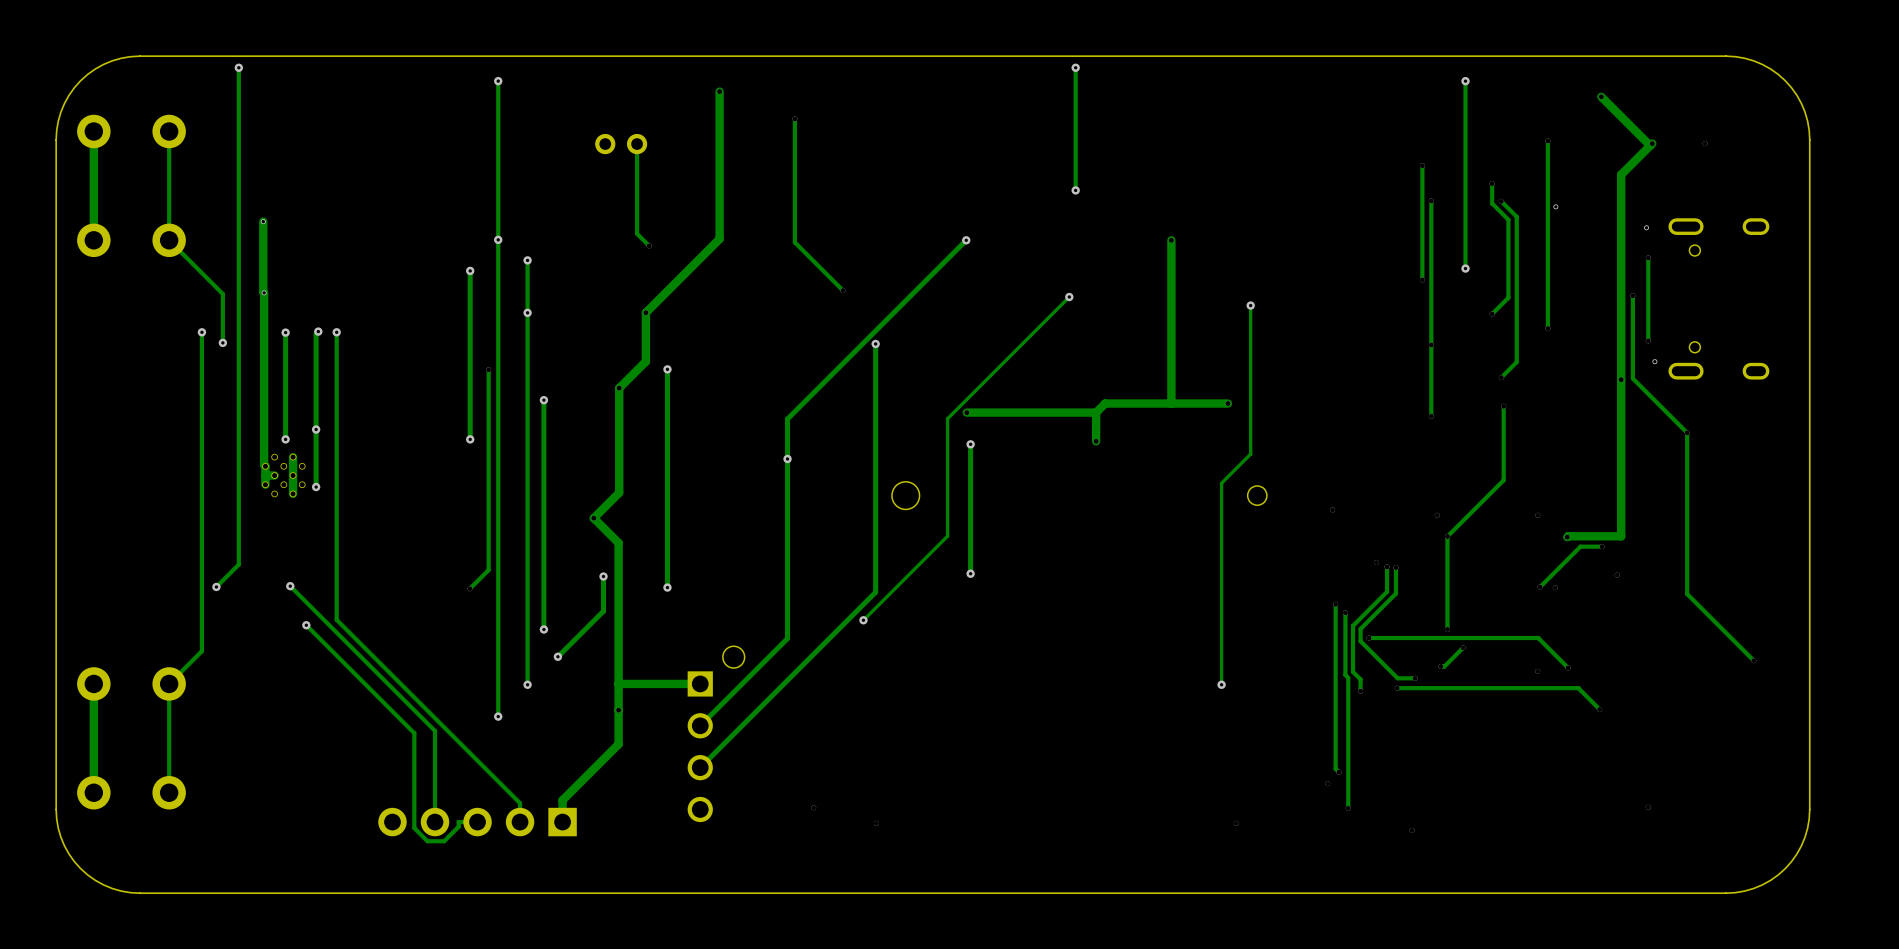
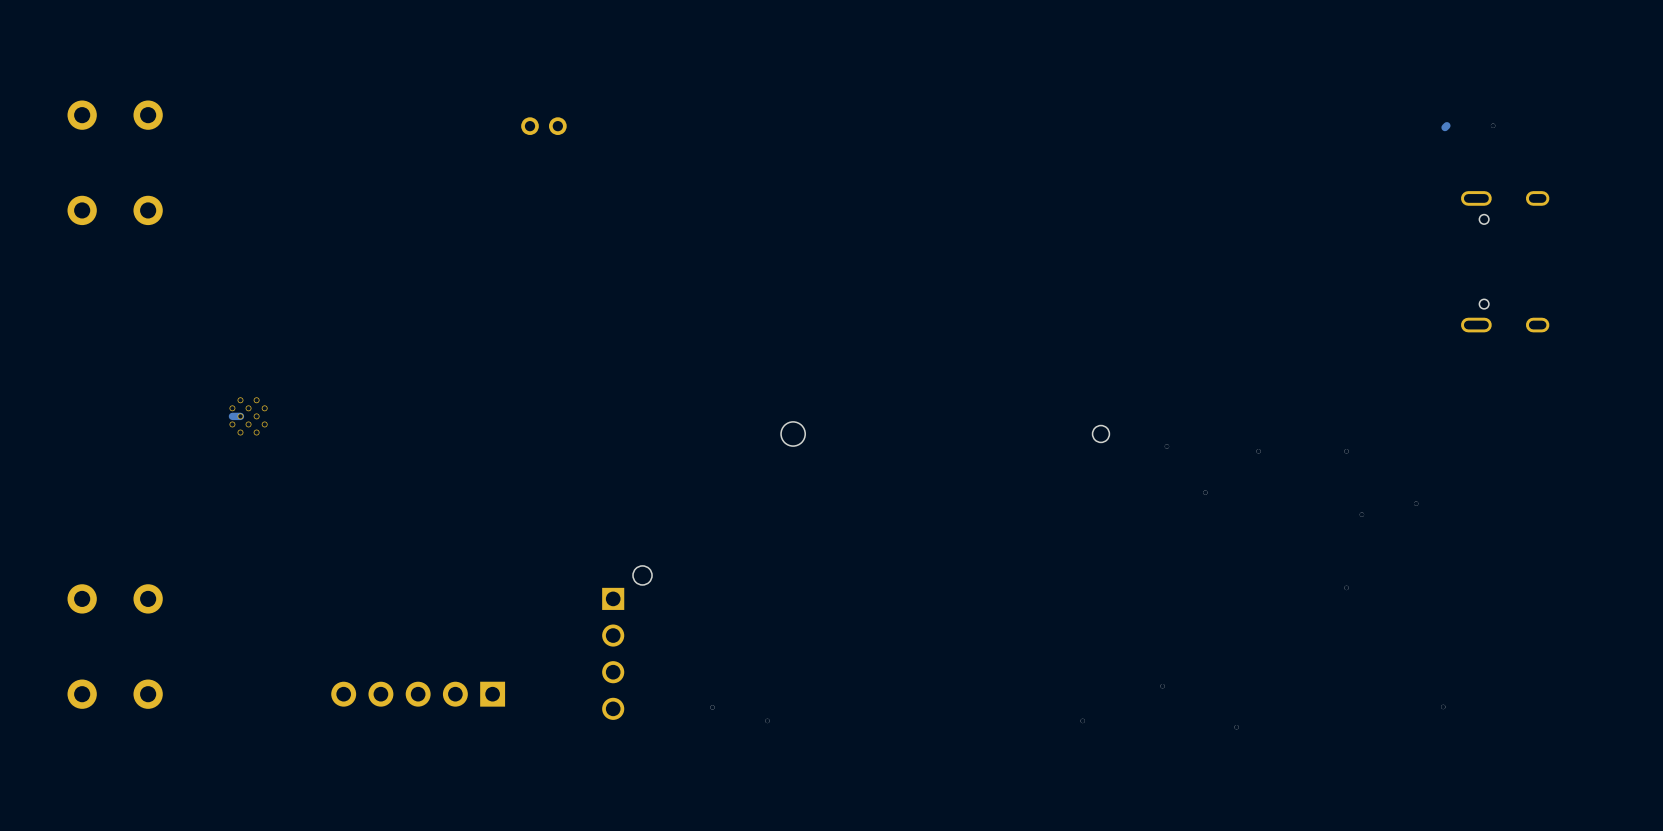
board edge: (1726, 56) (139, 56) (121, 58) (103, 64) (87, 74) (68, 95) (58, 121) (56, 139) (56, 809) (58, 828) (64, 845) (80, 868) (95, 880) (121, 891) (139, 893) (1726, 893) (1744, 891) (1762, 884) (1785, 868) (1796, 854) (1805, 837) (1809, 818) (1809, 139) (1805, 112) (1796, 95) (1785, 80) (1770, 68) (1753, 60) (1726, 56) -> none
track: (238, 67) (238, 564) (216, 586) -> none
via: (238, 67) -> none
track: (1075, 67) (1075, 190) -> none
via: (1075, 67) -> none
track: (498, 81) (498, 716) -> none
via: (498, 81) -> none
track: (1465, 81) (1465, 268) -> none
via: (1465, 81) -> none
track: (719, 91) (719, 239) (645, 312) (645, 361) (619, 388) (619, 492) (593, 518) (618, 542) (618, 744) (562, 800) (562, 822) -> none
via: (719, 91) -> none
track: (1601, 96) (1650, 145) (1621, 174) (1621, 536) (1567, 537) -> none
via: (1601, 96) -> none
track: (794, 118) (794, 242) (842, 290) -> none
via: (794, 118) -> none
track: (93, 131) (93, 240) -> none
track: (169, 131) (169, 240) (222, 294) (222, 342) -> none
track: (1547, 140) (1547, 328) -> none
via: (1547, 140) -> none
via: (1652, 143) -> none
track: (637, 144) (637, 233) (649, 245) -> none
track: (1422, 165) (1422, 279) -> none
via: (1422, 165) -> none
track: (1492, 183) (1492, 203) (1508, 219) (1508, 297) (1492, 314) -> none
via: (1492, 183) -> none
via: (1075, 190) -> none
track: (1431, 200) (1431, 416) -> none
via: (1431, 200) -> none
track: (1501, 201) (1516, 216) (1516, 362) (1501, 377) -> none
via: (1501, 201) -> none
via: (1555, 206) -> none
track: (263, 221) (265, 484) -> none
via: (263, 221) -> none
via: (1646, 227) -> none
via: (498, 239) -> none
track: (966, 240) (787, 419) (787, 638) (700, 725) -> none
via: (966, 240) -> none
track: (1171, 240) (1171, 403) -> none
via: (1171, 240) -> none
via: (649, 245) -> none
track: (1648, 257) (1648, 340) -> none
via: (1648, 257) -> none
track: (527, 260) (527, 684) -> none
via: (527, 260) -> none
via: (1465, 268) -> none
track: (470, 270) (470, 439) -> none
via: (470, 270) -> none
via: (1422, 279) -> none
via: (842, 290) -> none
via: (264, 292) -> none
track: (1632, 295) (1632, 378) (1687, 432) (1687, 594) (1753, 660) -> none
via: (1632, 295) -> none
track: (1069, 297) (947, 418) (947, 536) (863, 620) -> none
via: (1069, 297) -> none
track: (1250, 305) (1250, 454) (1221, 483) (1221, 684) -> none
via: (1250, 305) -> none
via: (527, 312) -> none
via: (645, 312) -> none
via: (1492, 314) -> none
via: (1547, 328) -> none
track: (318, 331) (316, 333) (316, 487) -> none
via: (318, 331) -> none
track: (201, 332) (201, 651) (169, 683) (169, 792) -> none
via: (201, 332) -> none
track: (285, 332) (285, 439) -> none
via: (285, 332) -> none
track: (336, 332) (336, 619) (520, 803) (520, 822) -> none
via: (336, 332) -> none
via: (1648, 340) -> none
via: (222, 342) -> none
track: (875, 343) (875, 592) (700, 767) -> none
via: (875, 343) -> none
via: (1431, 344) -> none
via: (1654, 361) -> none
track: (488, 369) (488, 570) (469, 588) -> none
via: (488, 369) -> none
track: (667, 369) (667, 587) -> none
via: (667, 369) -> none
via: (1501, 377) -> none
via: (1621, 379) -> none
via: (619, 388) -> none
track: (543, 400) (543, 629) -> none
via: (543, 400) -> none
track: (1228, 403) (1105, 403) (1096, 412) -> none
via: (1228, 403) -> none
track: (1503, 406) (1503, 480) (1447, 536) (1447, 629) -> none
via: (1503, 406) -> none
via: (966, 412) -> none
track: (1096, 412) (966, 412) -> none
track: (1096, 412) (1096, 441) -> none
via: (1431, 416) -> none
via: (316, 429) -> none
via: (1687, 432) -> none
via: (285, 439) -> none
via: (470, 439) -> none
via: (1096, 441) -> none
track: (970, 444) (970, 573) -> none
via: (970, 444) -> none
track: (293, 457) (293, 493) -> none
via: (787, 458) -> none
via: (316, 487) -> none
via: (593, 518) -> none
via: (1447, 536) -> none
via: (1567, 537) -> none
track: (1602, 546) (1580, 546) (1540, 587) -> none
via: (1602, 546) -> none
track: (1387, 566) (1387, 591) (1353, 625) (1353, 671) (1360, 679) (1360, 691) -> none
via: (1387, 566) -> none
track: (1395, 567) (1395, 593) (1360, 628) (1360, 641) (1397, 678) (1415, 678) -> none
via: (1395, 567) -> none
via: (970, 573) -> none
track: (603, 576) (603, 611) (557, 656) -> none
via: (603, 576) -> none
via: (216, 586) -> none
track: (290, 586) (435, 730) (435, 822) -> none
via: (290, 586) -> none
via: (667, 587) -> none
via: (1540, 587) -> none
via: (469, 588) -> none
track: (1335, 604) (1335, 768) (1338, 772) -> none
via: (1335, 604) -> none
track: (1345, 612) (1345, 675) (1348, 677) (1348, 808) -> none
via: (1345, 612) -> none
via: (863, 620) -> none
track: (306, 625) (414, 733) (414, 828) (427, 841) (444, 841) (458, 826) (458, 822) (477, 822) -> none
via: (306, 625) -> none
via: (543, 629) -> none
via: (1447, 629) -> none
track: (1369, 638) (1538, 638) (1568, 667) -> none
via: (1369, 638) -> none
track: (1463, 647) (1444, 666) (1440, 666) -> none
via: (1463, 647) -> none
via: (557, 656) -> none
via: (1753, 660) -> none
via: (1440, 666) -> none
via: (1568, 667) -> none
via: (1415, 678) -> none
track: (93, 683) (93, 792) -> none
track: (700, 683) (618, 683) -> none
via: (527, 684) -> none
via: (1221, 684) -> none
track: (1397, 688) (1578, 688) (1599, 709) -> none
via: (1397, 688) -> none
via: (1360, 691) -> none
via: (1599, 709) -> none
via: (618, 710) -> none
via: (498, 716) -> none
via: (1338, 772) -> none
via: (1348, 808) -> none
part position: (477, 822) -> (418, 694)

